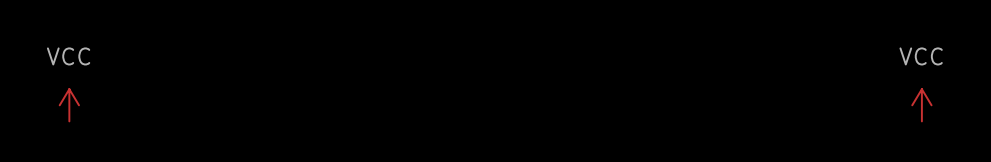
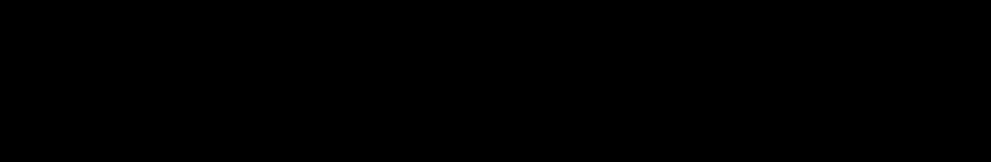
power symbol: VCC (69, 105) -> none
power symbol: VCC (921, 105) -> none

